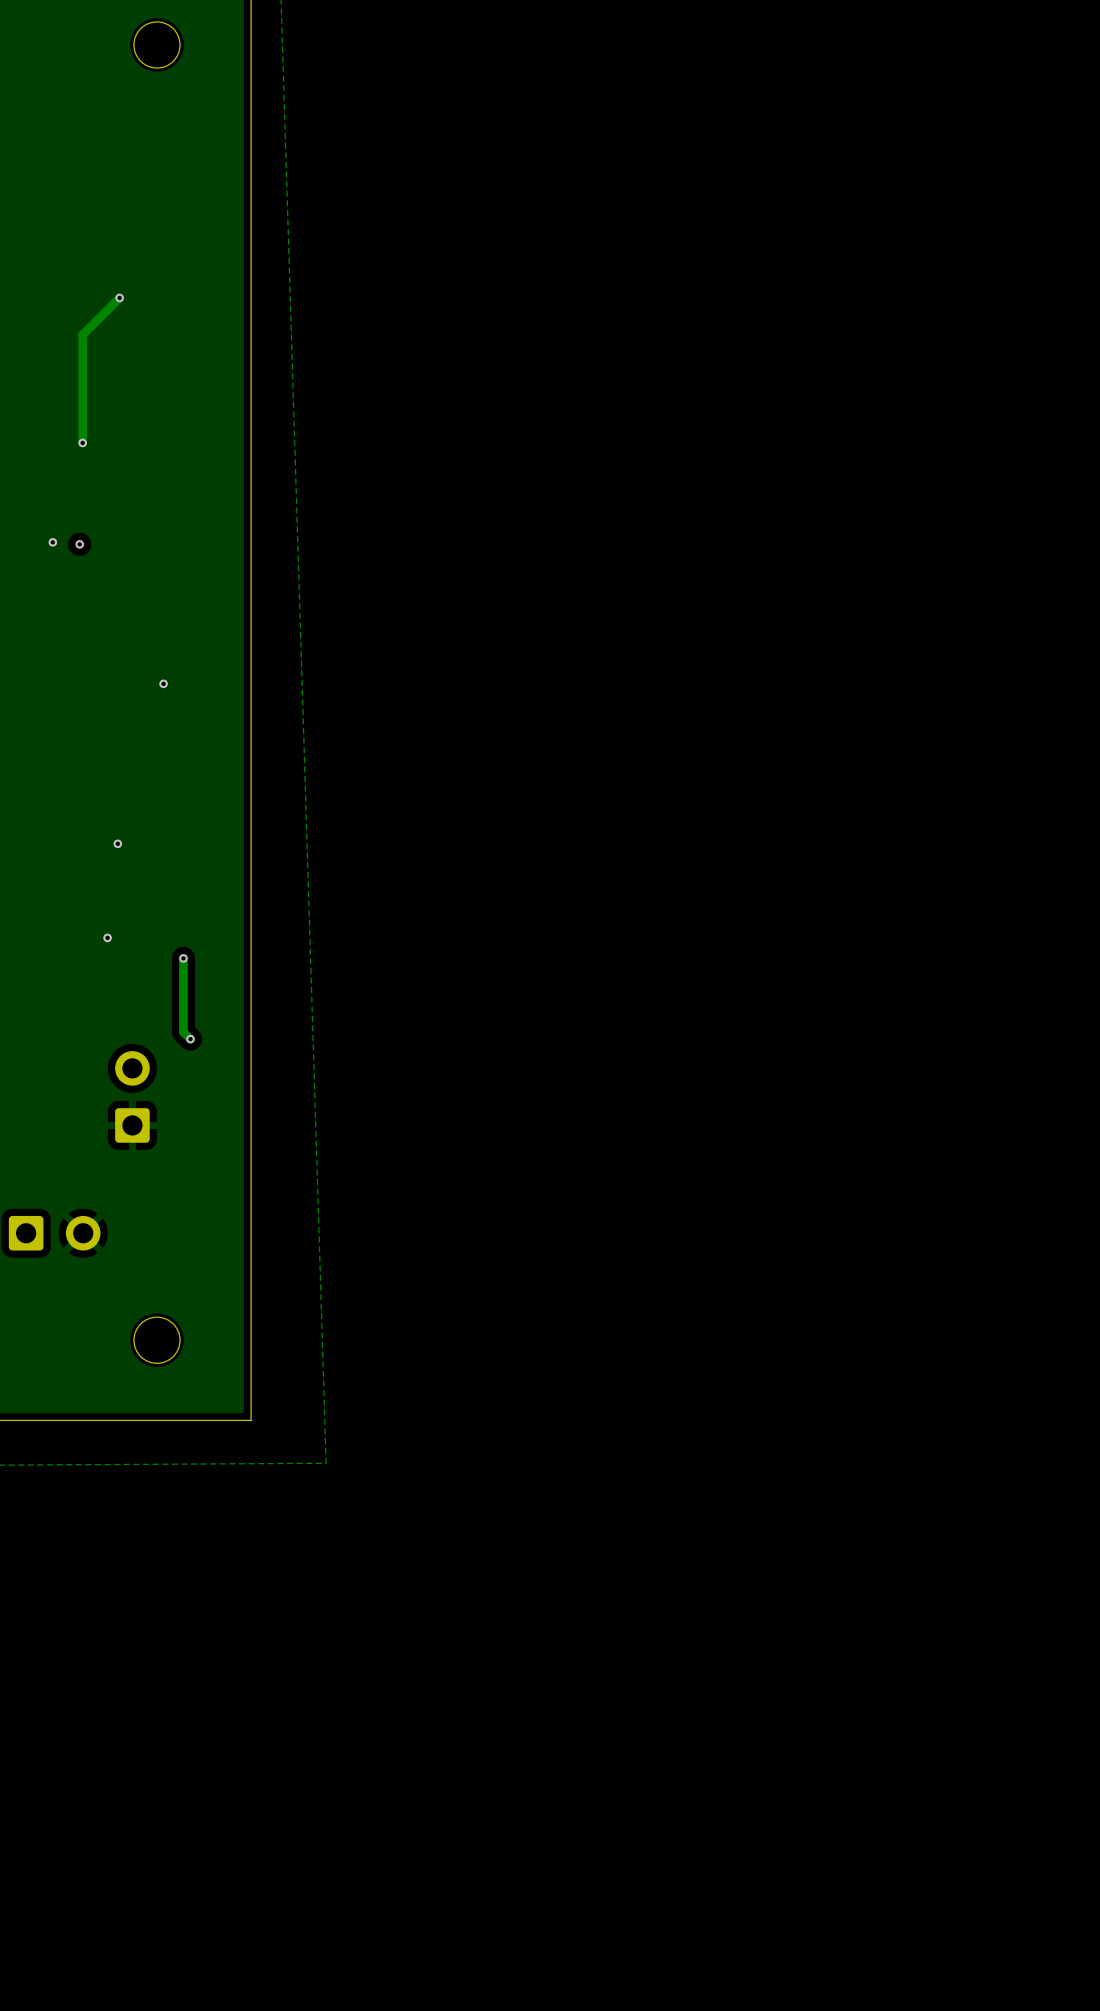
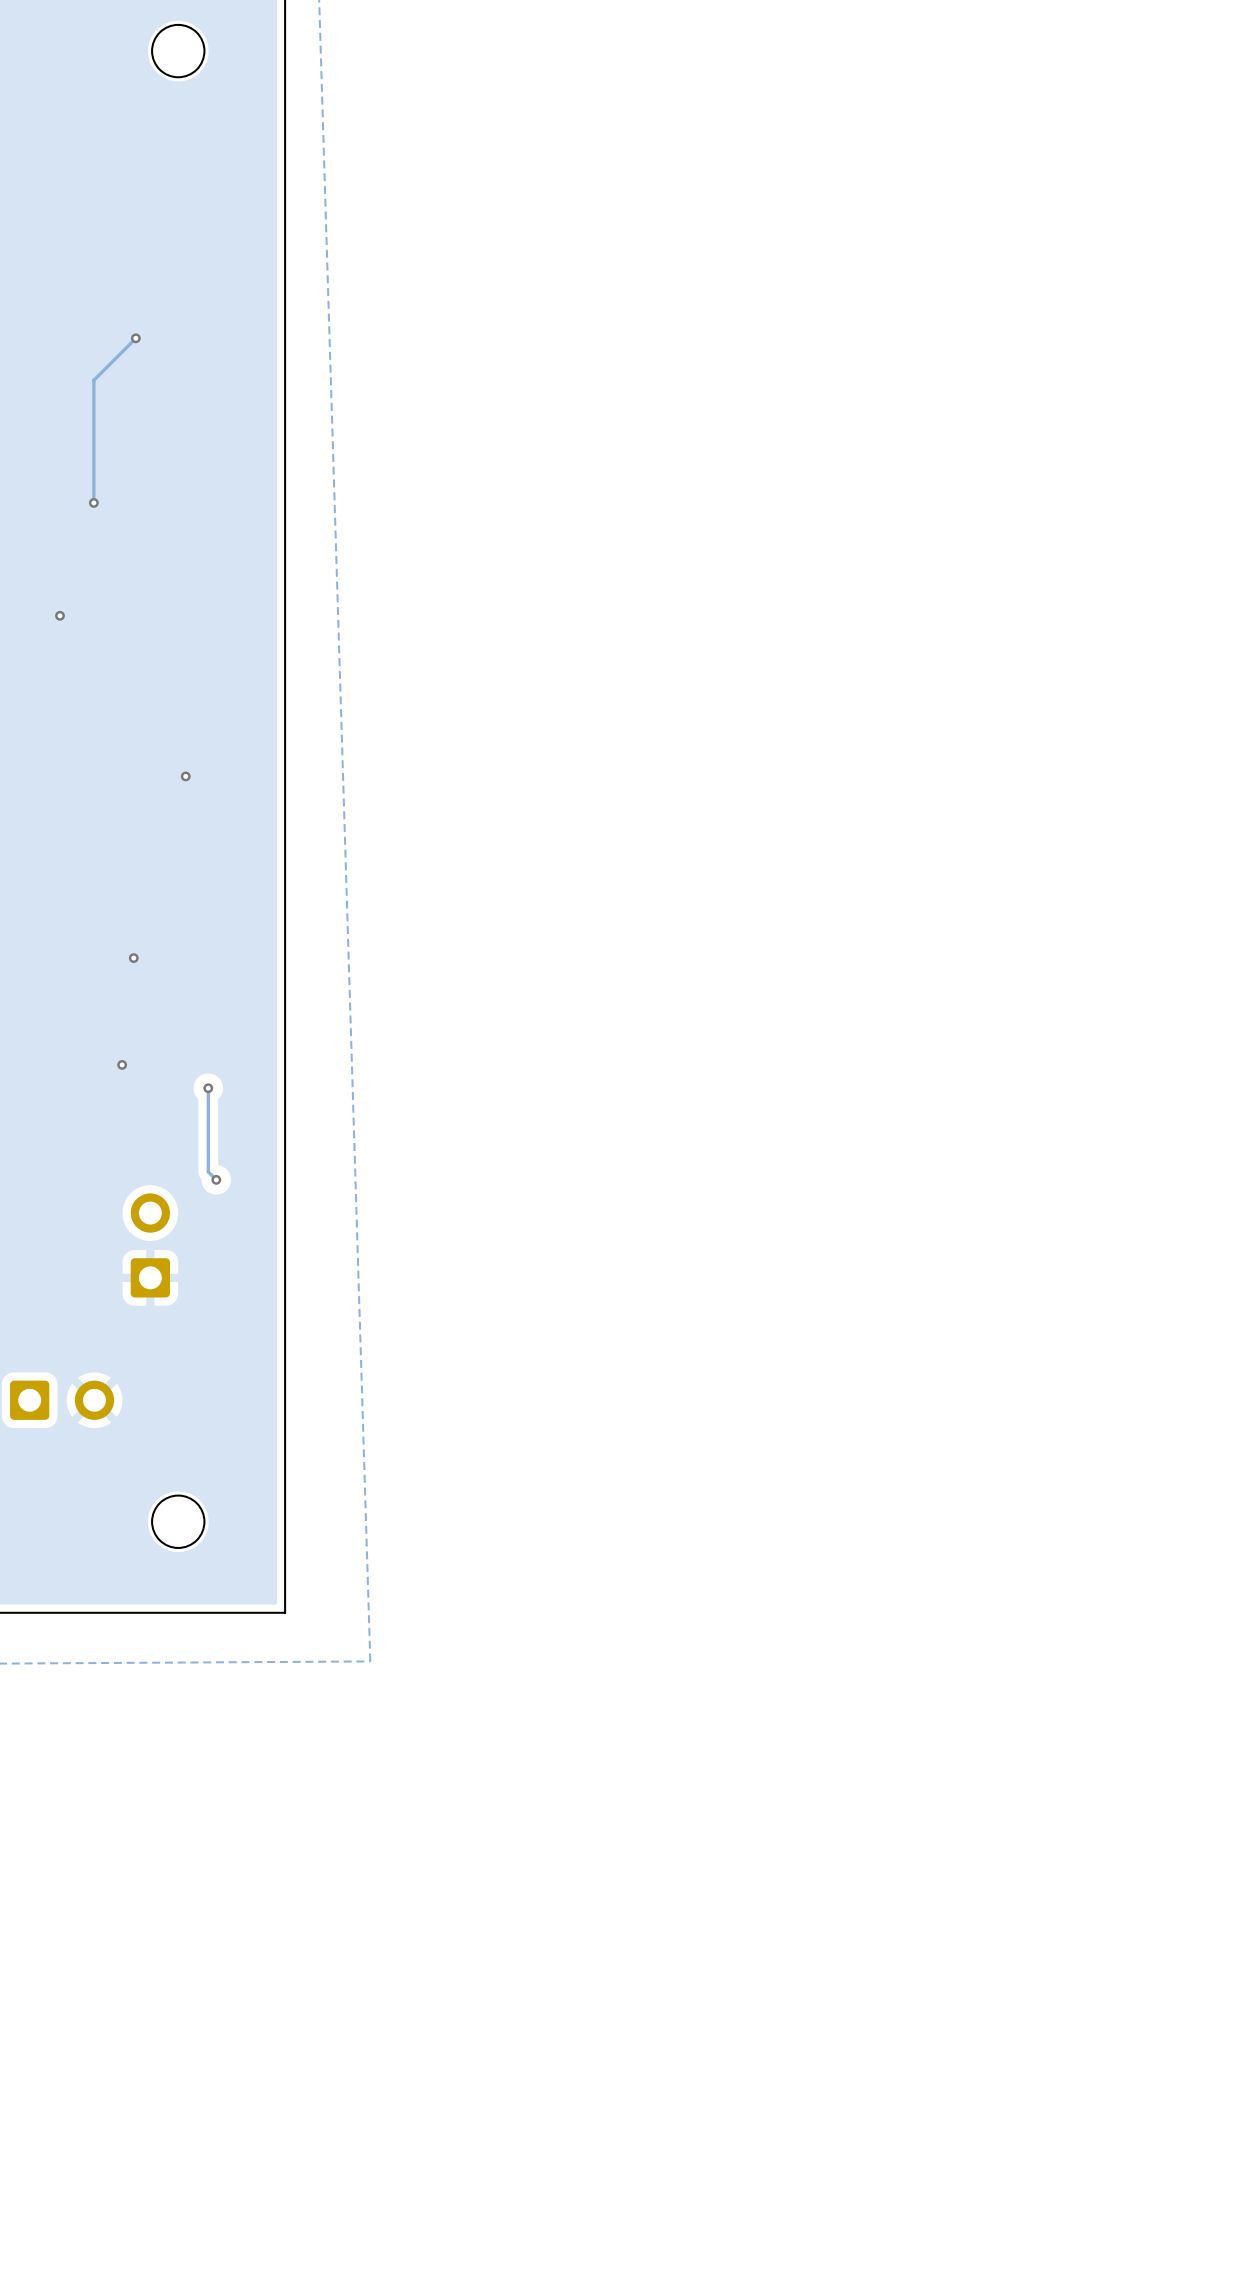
track width: thick (119, 297) (82, 334) (82, 442) -> thin (135, 338) (93, 380) (93, 502)
via: (79, 544) -> none
track width: thick (183, 958) (183, 1032) (190, 1039) -> thin (208, 1088) (208, 1171) (216, 1179)

